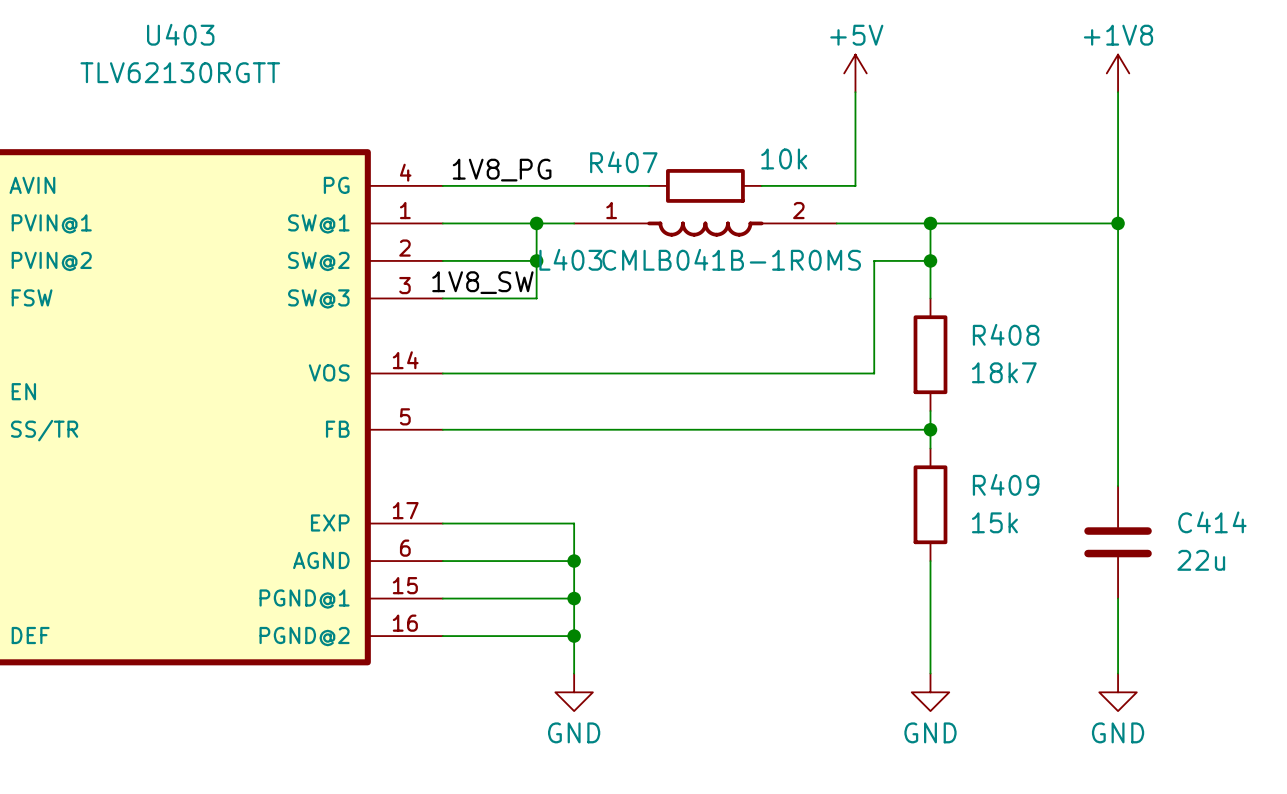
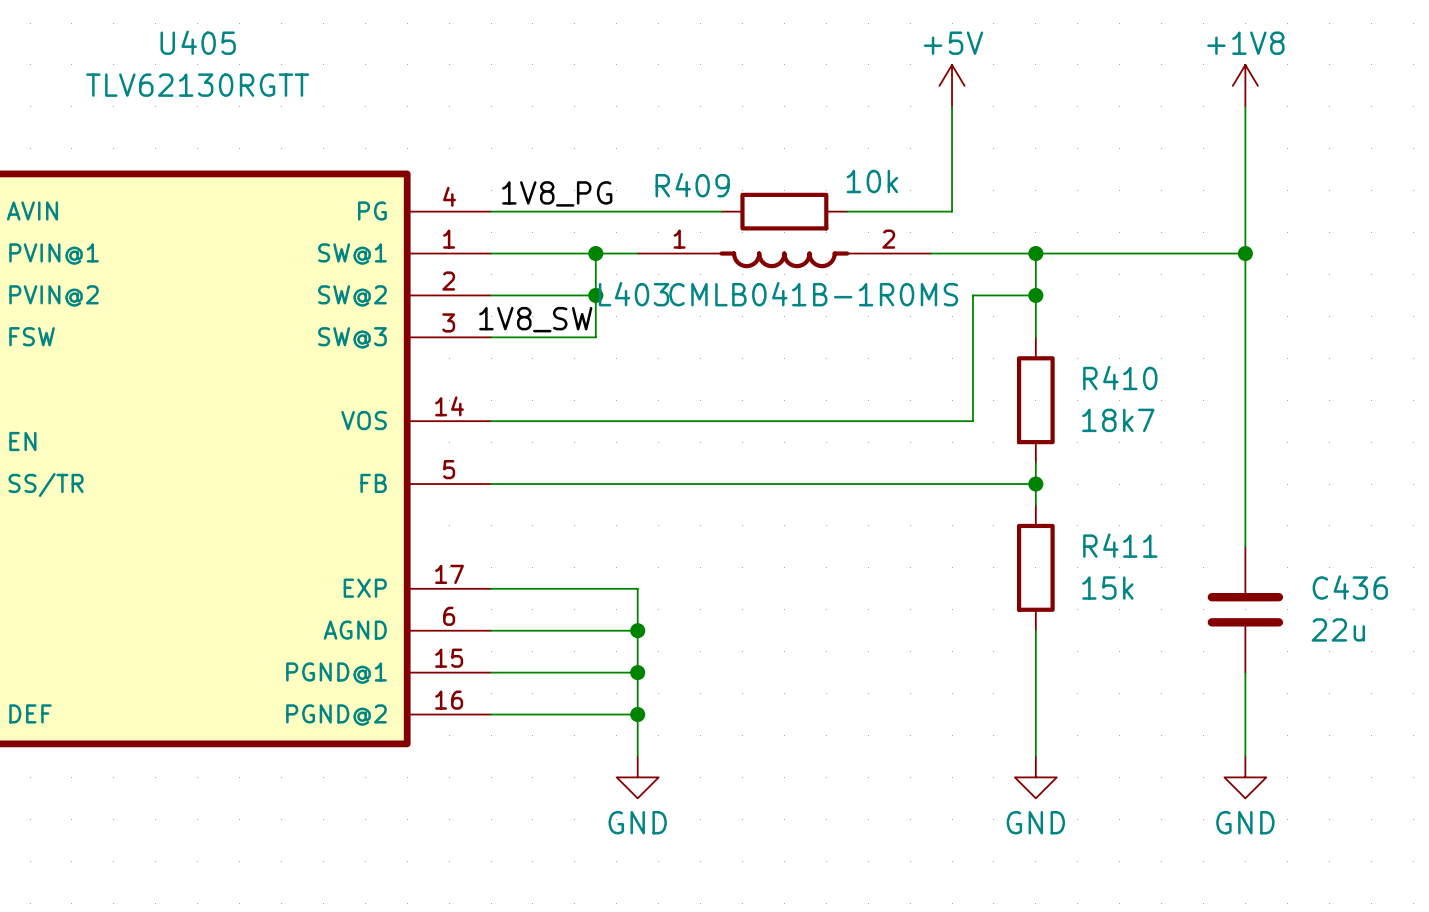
U403 name: U403 (180, 34) -> U405 (198, 42)
R407 name: R407 (623, 162) -> R409 (692, 185)
R408 name: R408 (1006, 334) -> R410 (1120, 377)
R409 name: R409 (1006, 484) -> R411 (1120, 545)
C414 name: C414 (1212, 522) -> C436 (1350, 587)

